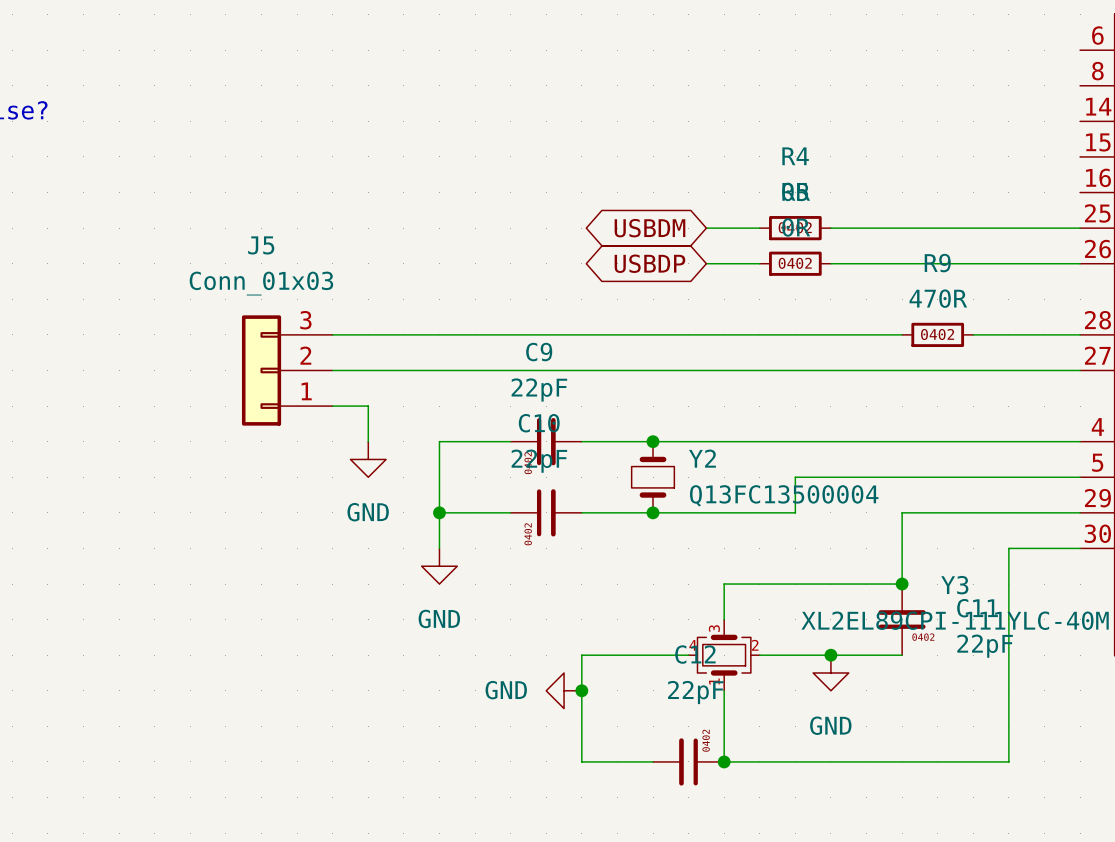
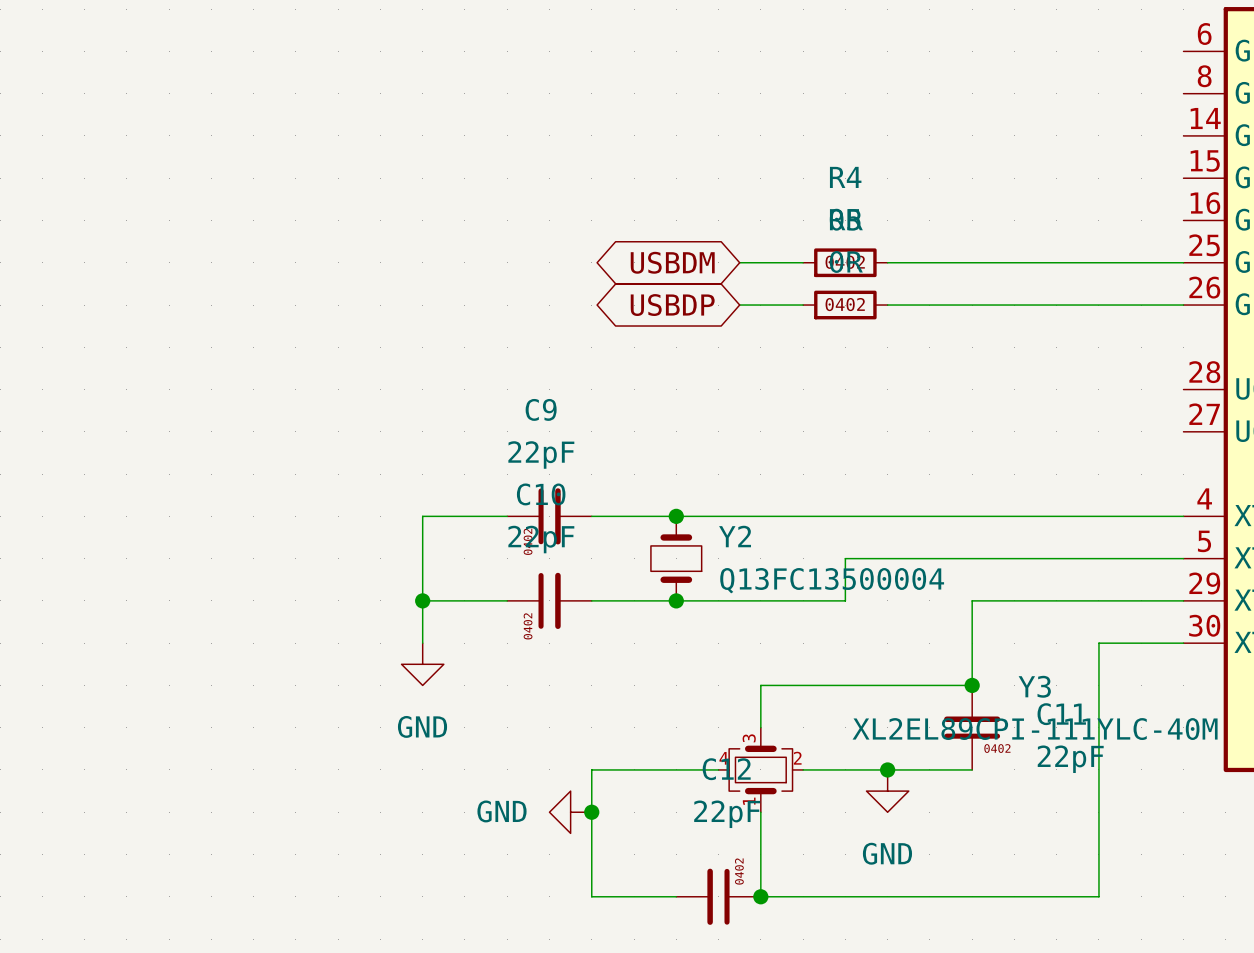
wire: (332, 334) (902, 334) -> none
R9: 470R (937, 334) -> none
wire: (973, 334) (1080, 334) -> none
J5: Conn_01x03 (287, 370) -> none
wire: (332, 370) (1080, 370) -> none
wire: (332, 406) (368, 406) (368, 441) -> none
power symbol: GND (368, 459) -> none

